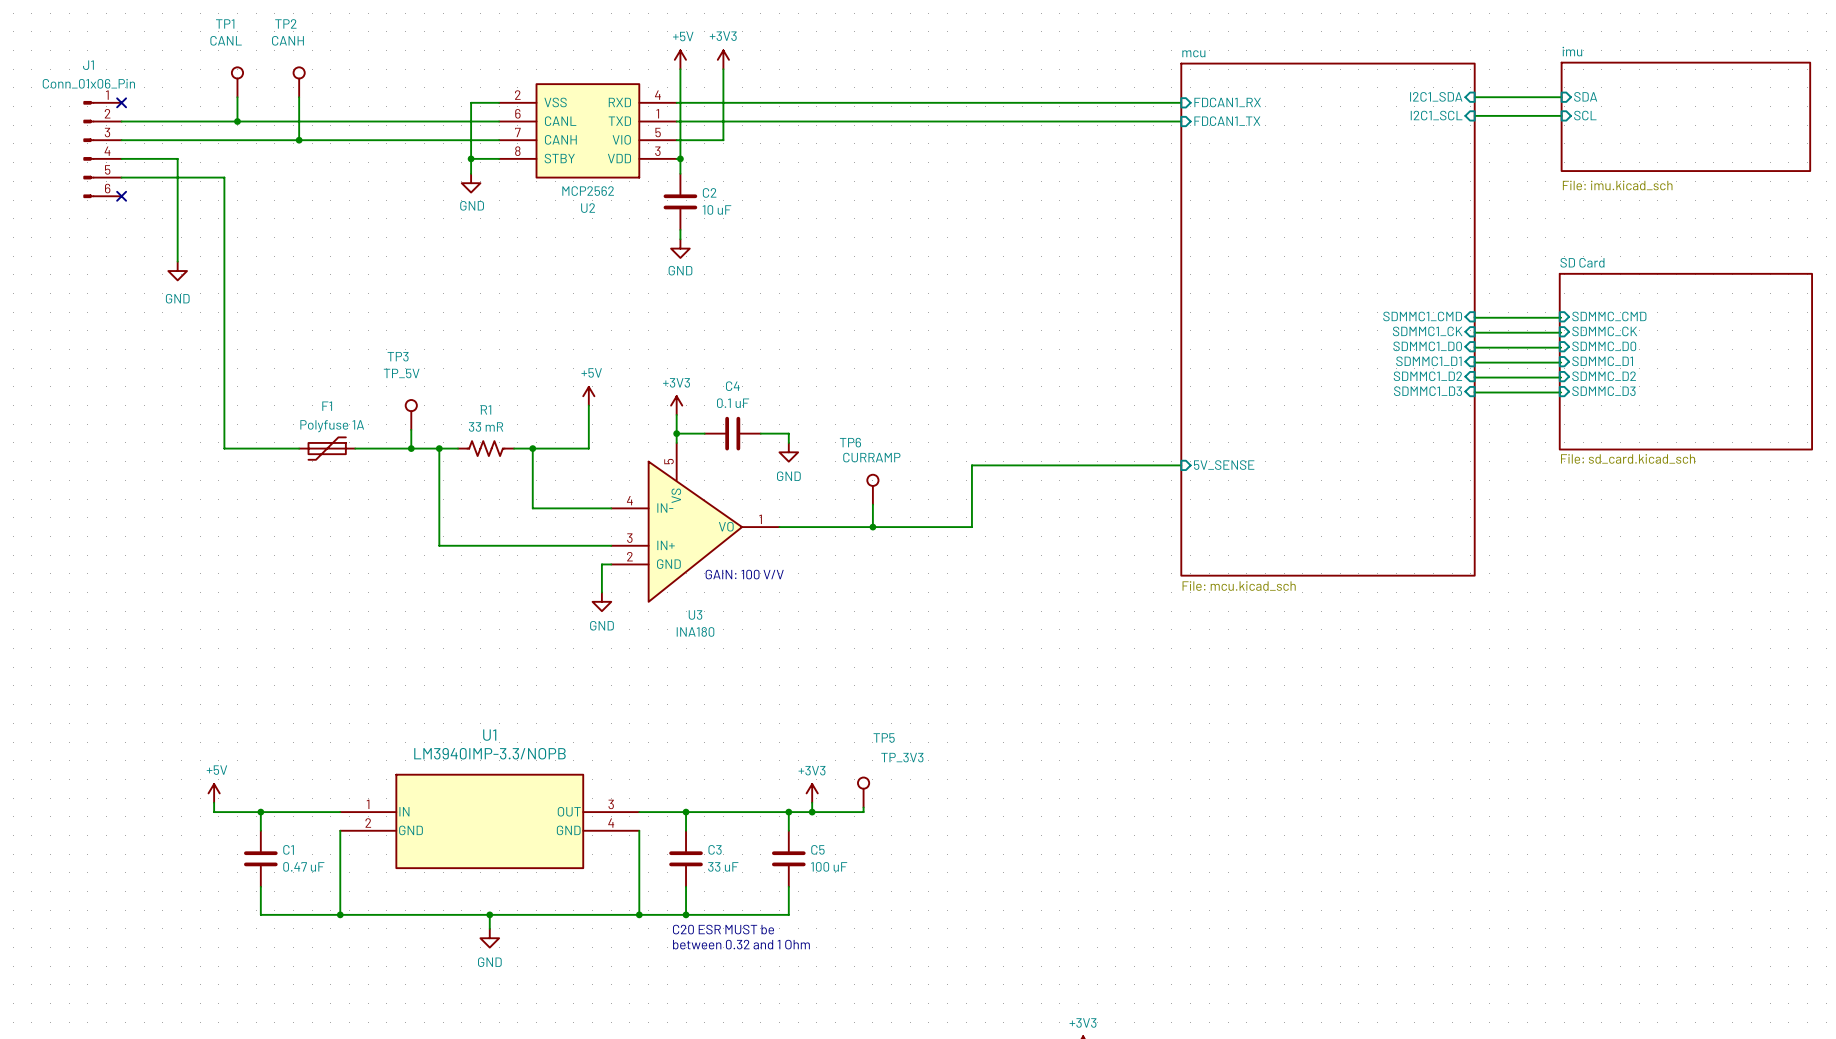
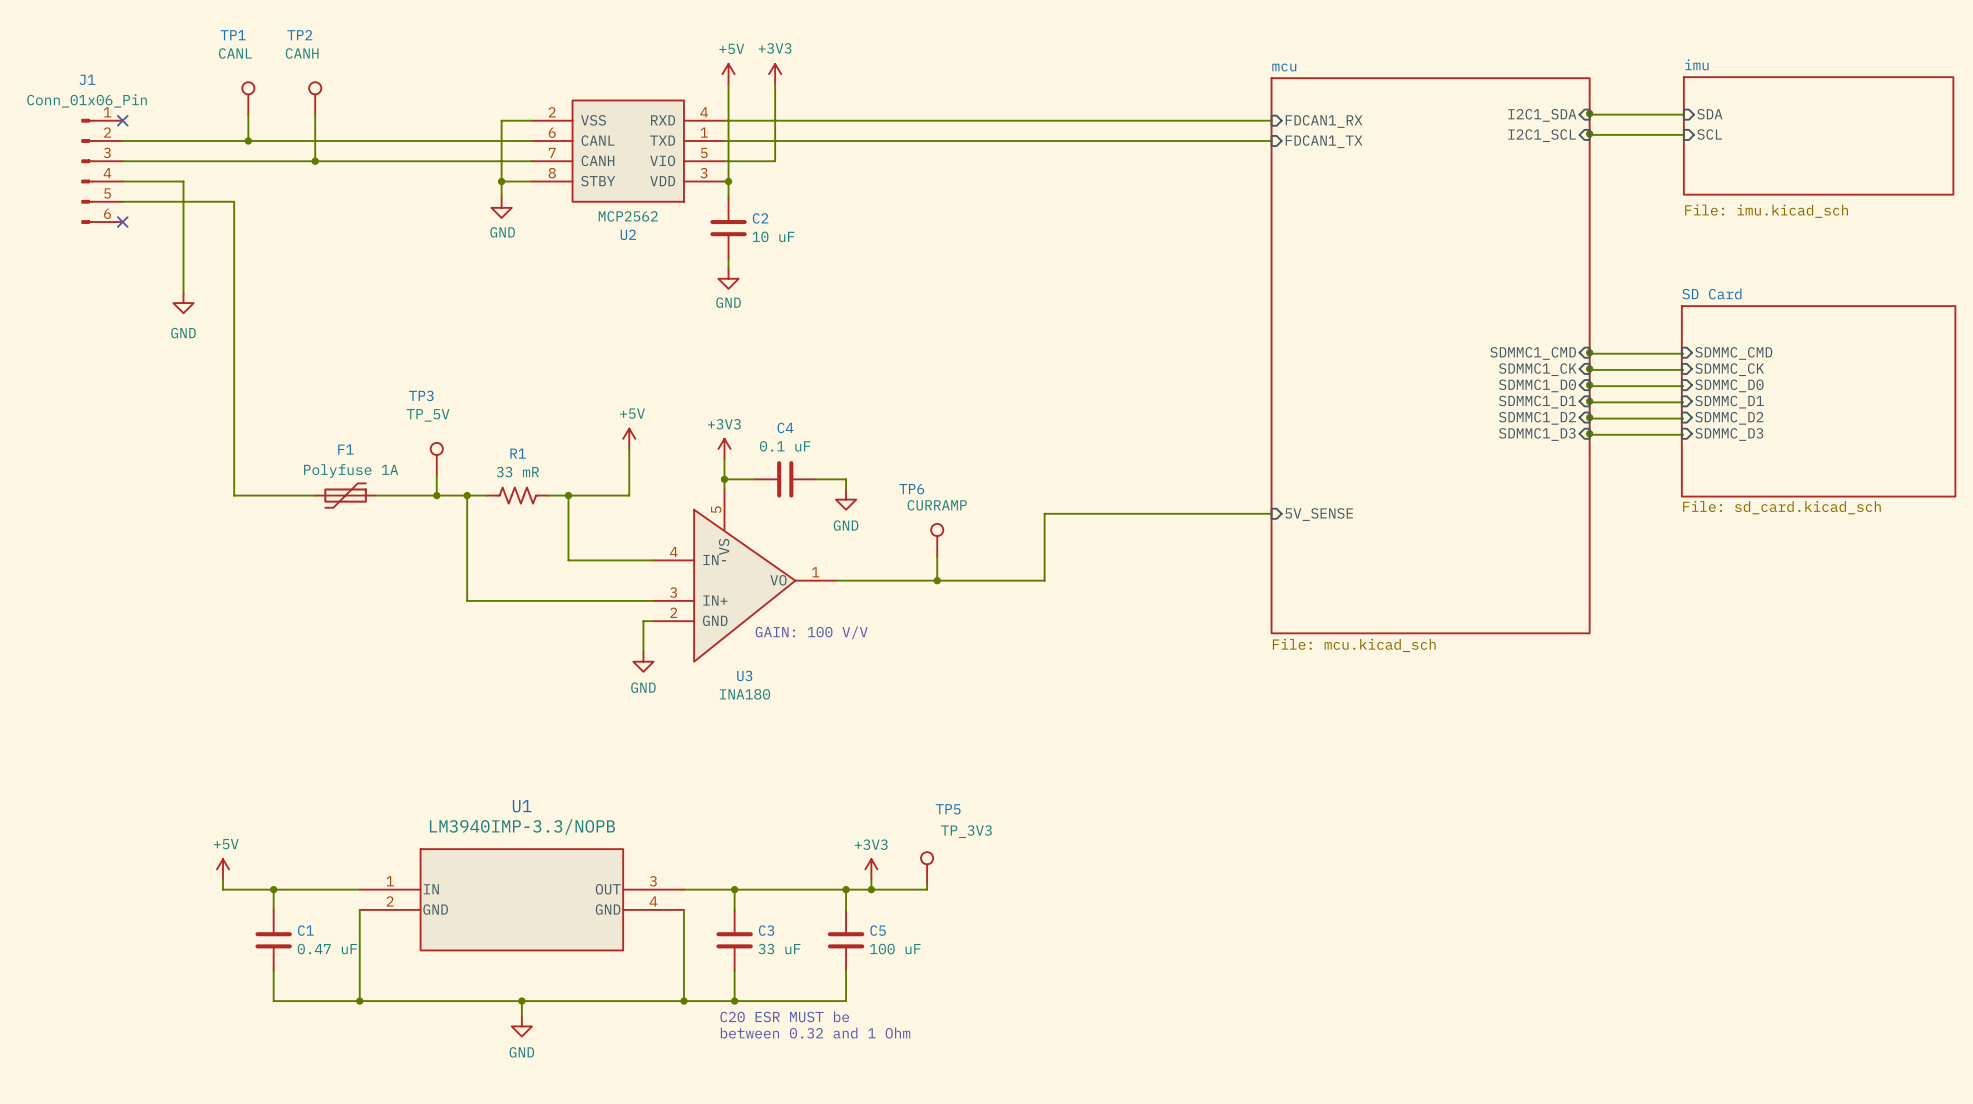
junction: none -> (1589, 113)
junction: none -> (1589, 133)
junction: none -> (1589, 352)
junction: none -> (1589, 368)
junction: none -> (1589, 385)
junction: none -> (1589, 401)
junction: none -> (1589, 417)
junction: none -> (1589, 433)

